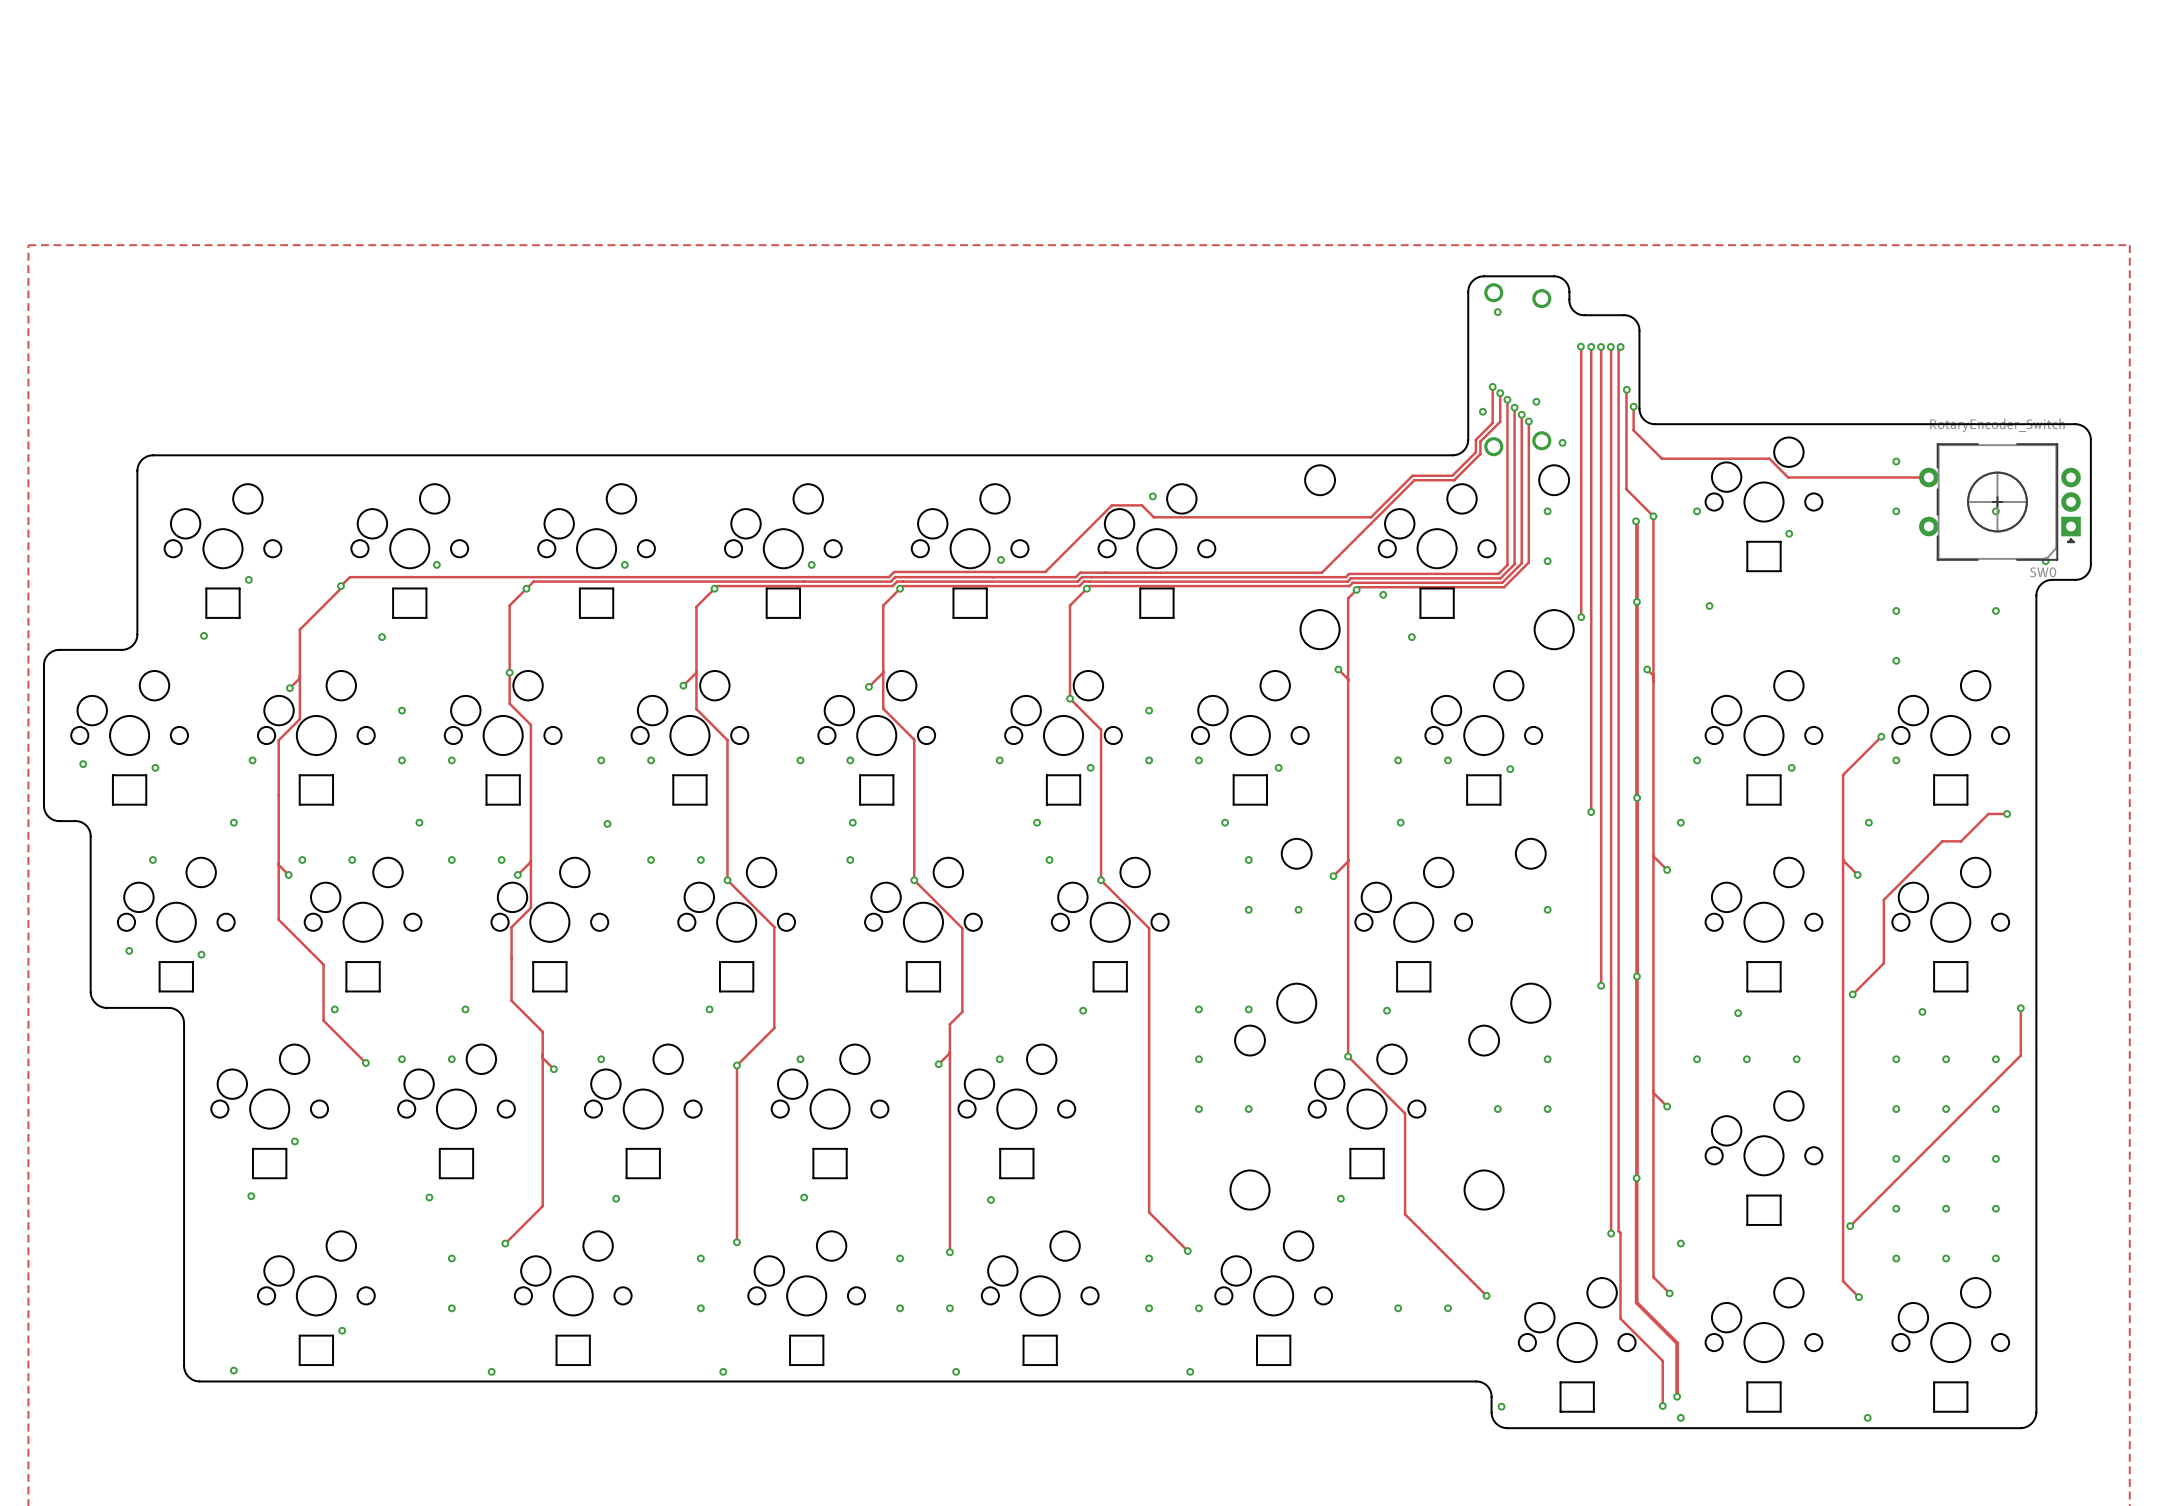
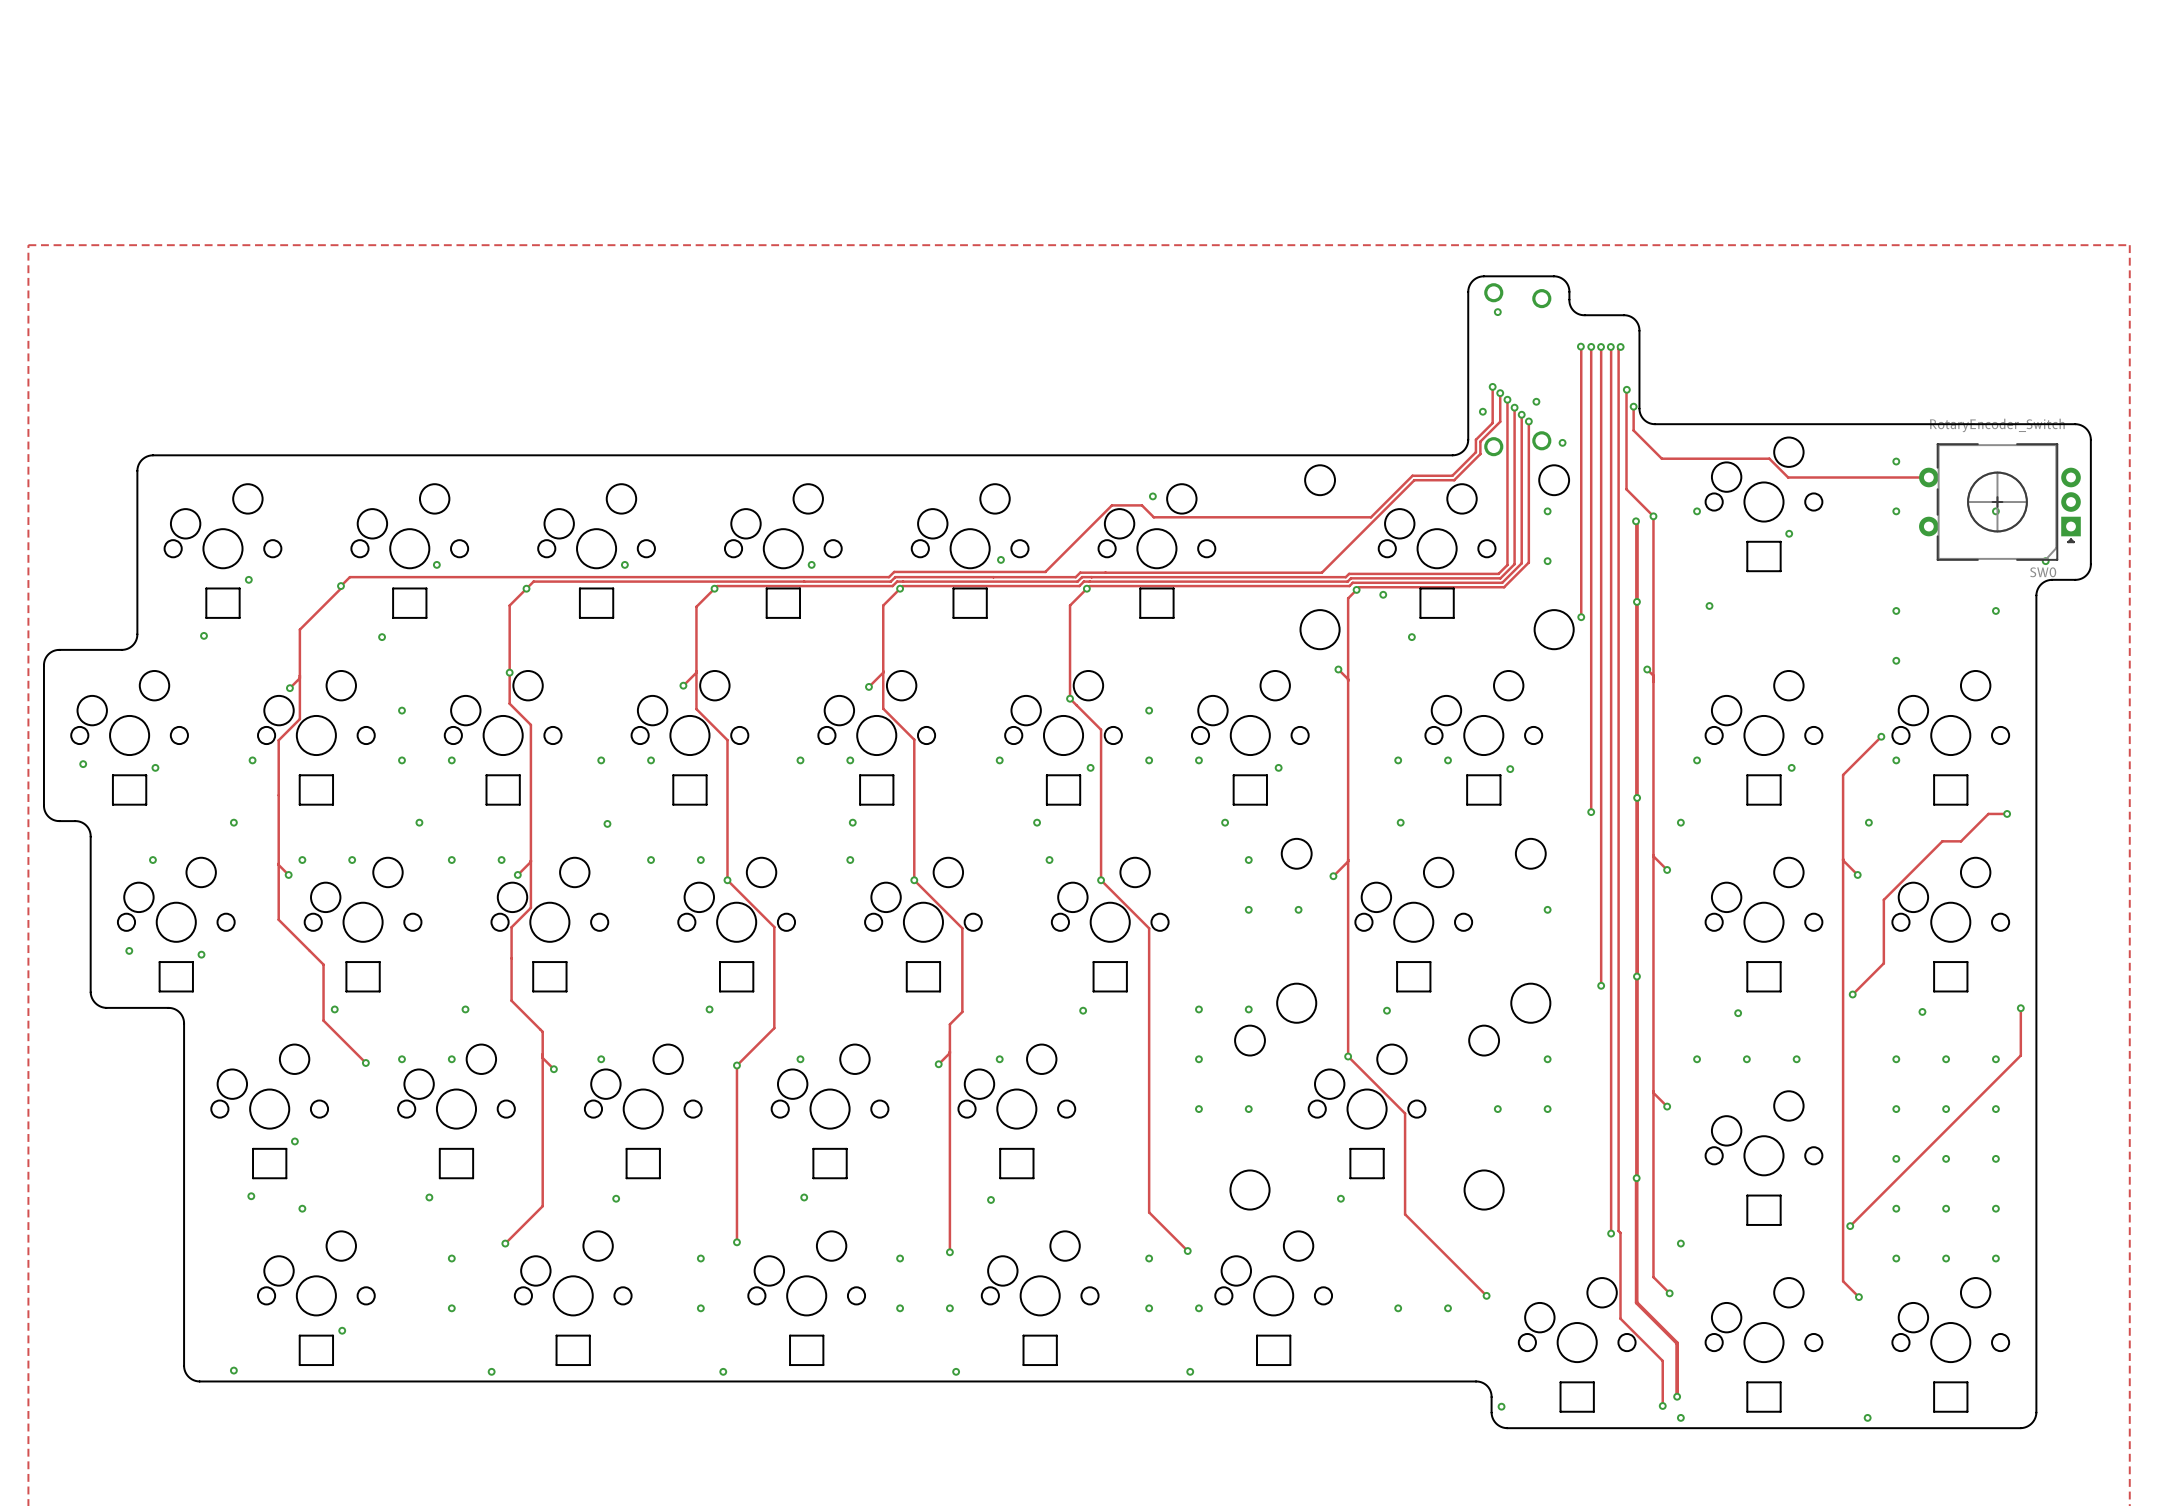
via: none -> (302, 1208)

